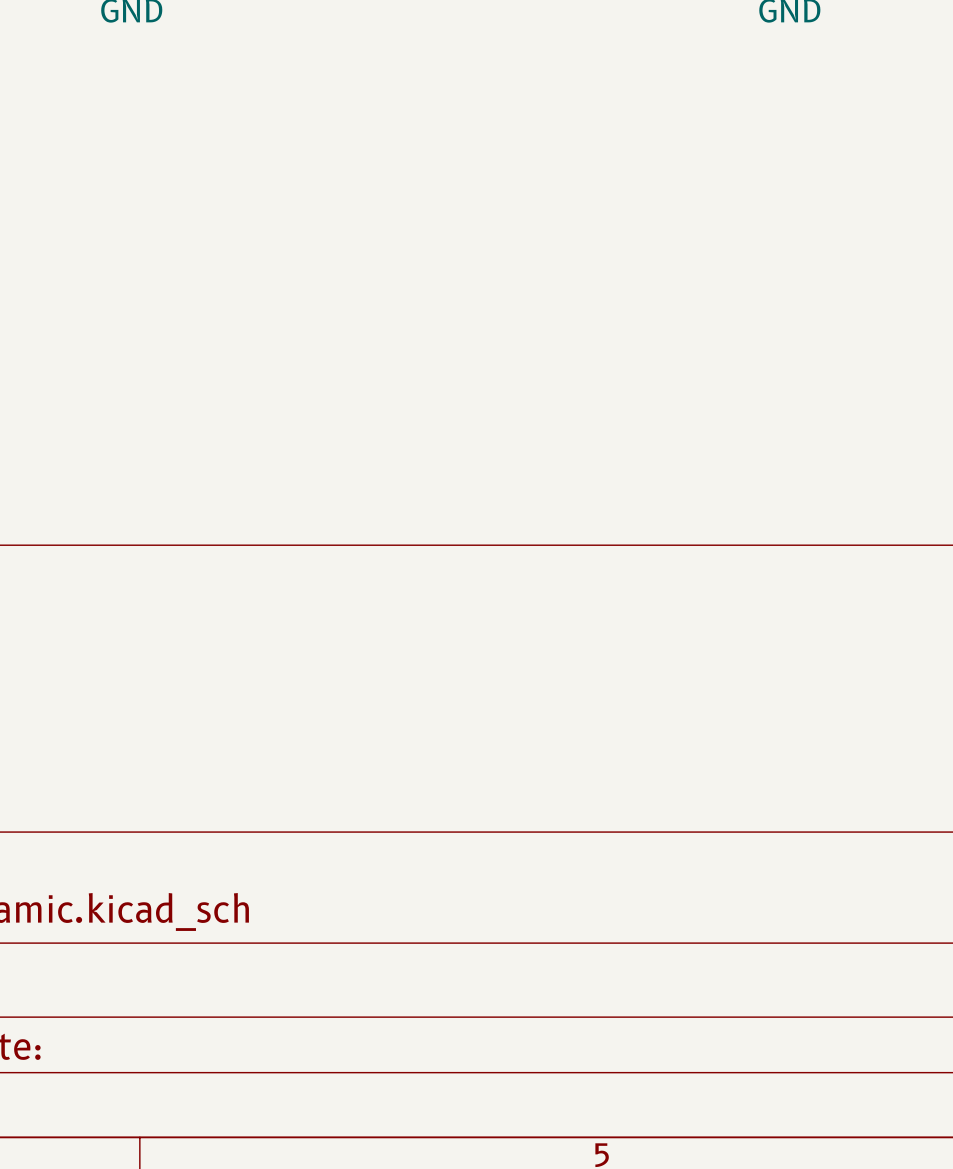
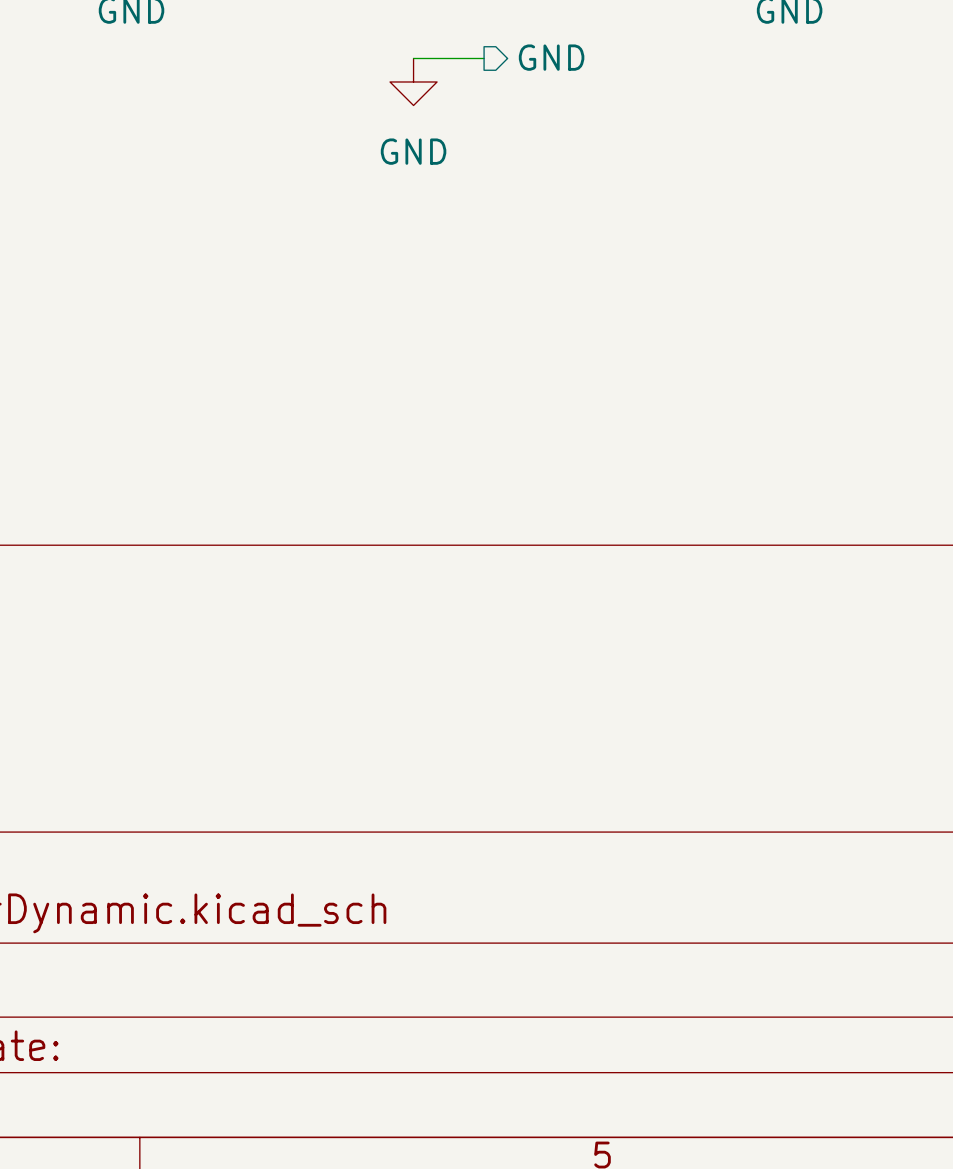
sheet pin: none -> GND (551, 57)
wire: none -> (413, 58) (484, 58)
power symbol: none -> GND (413, 81)

